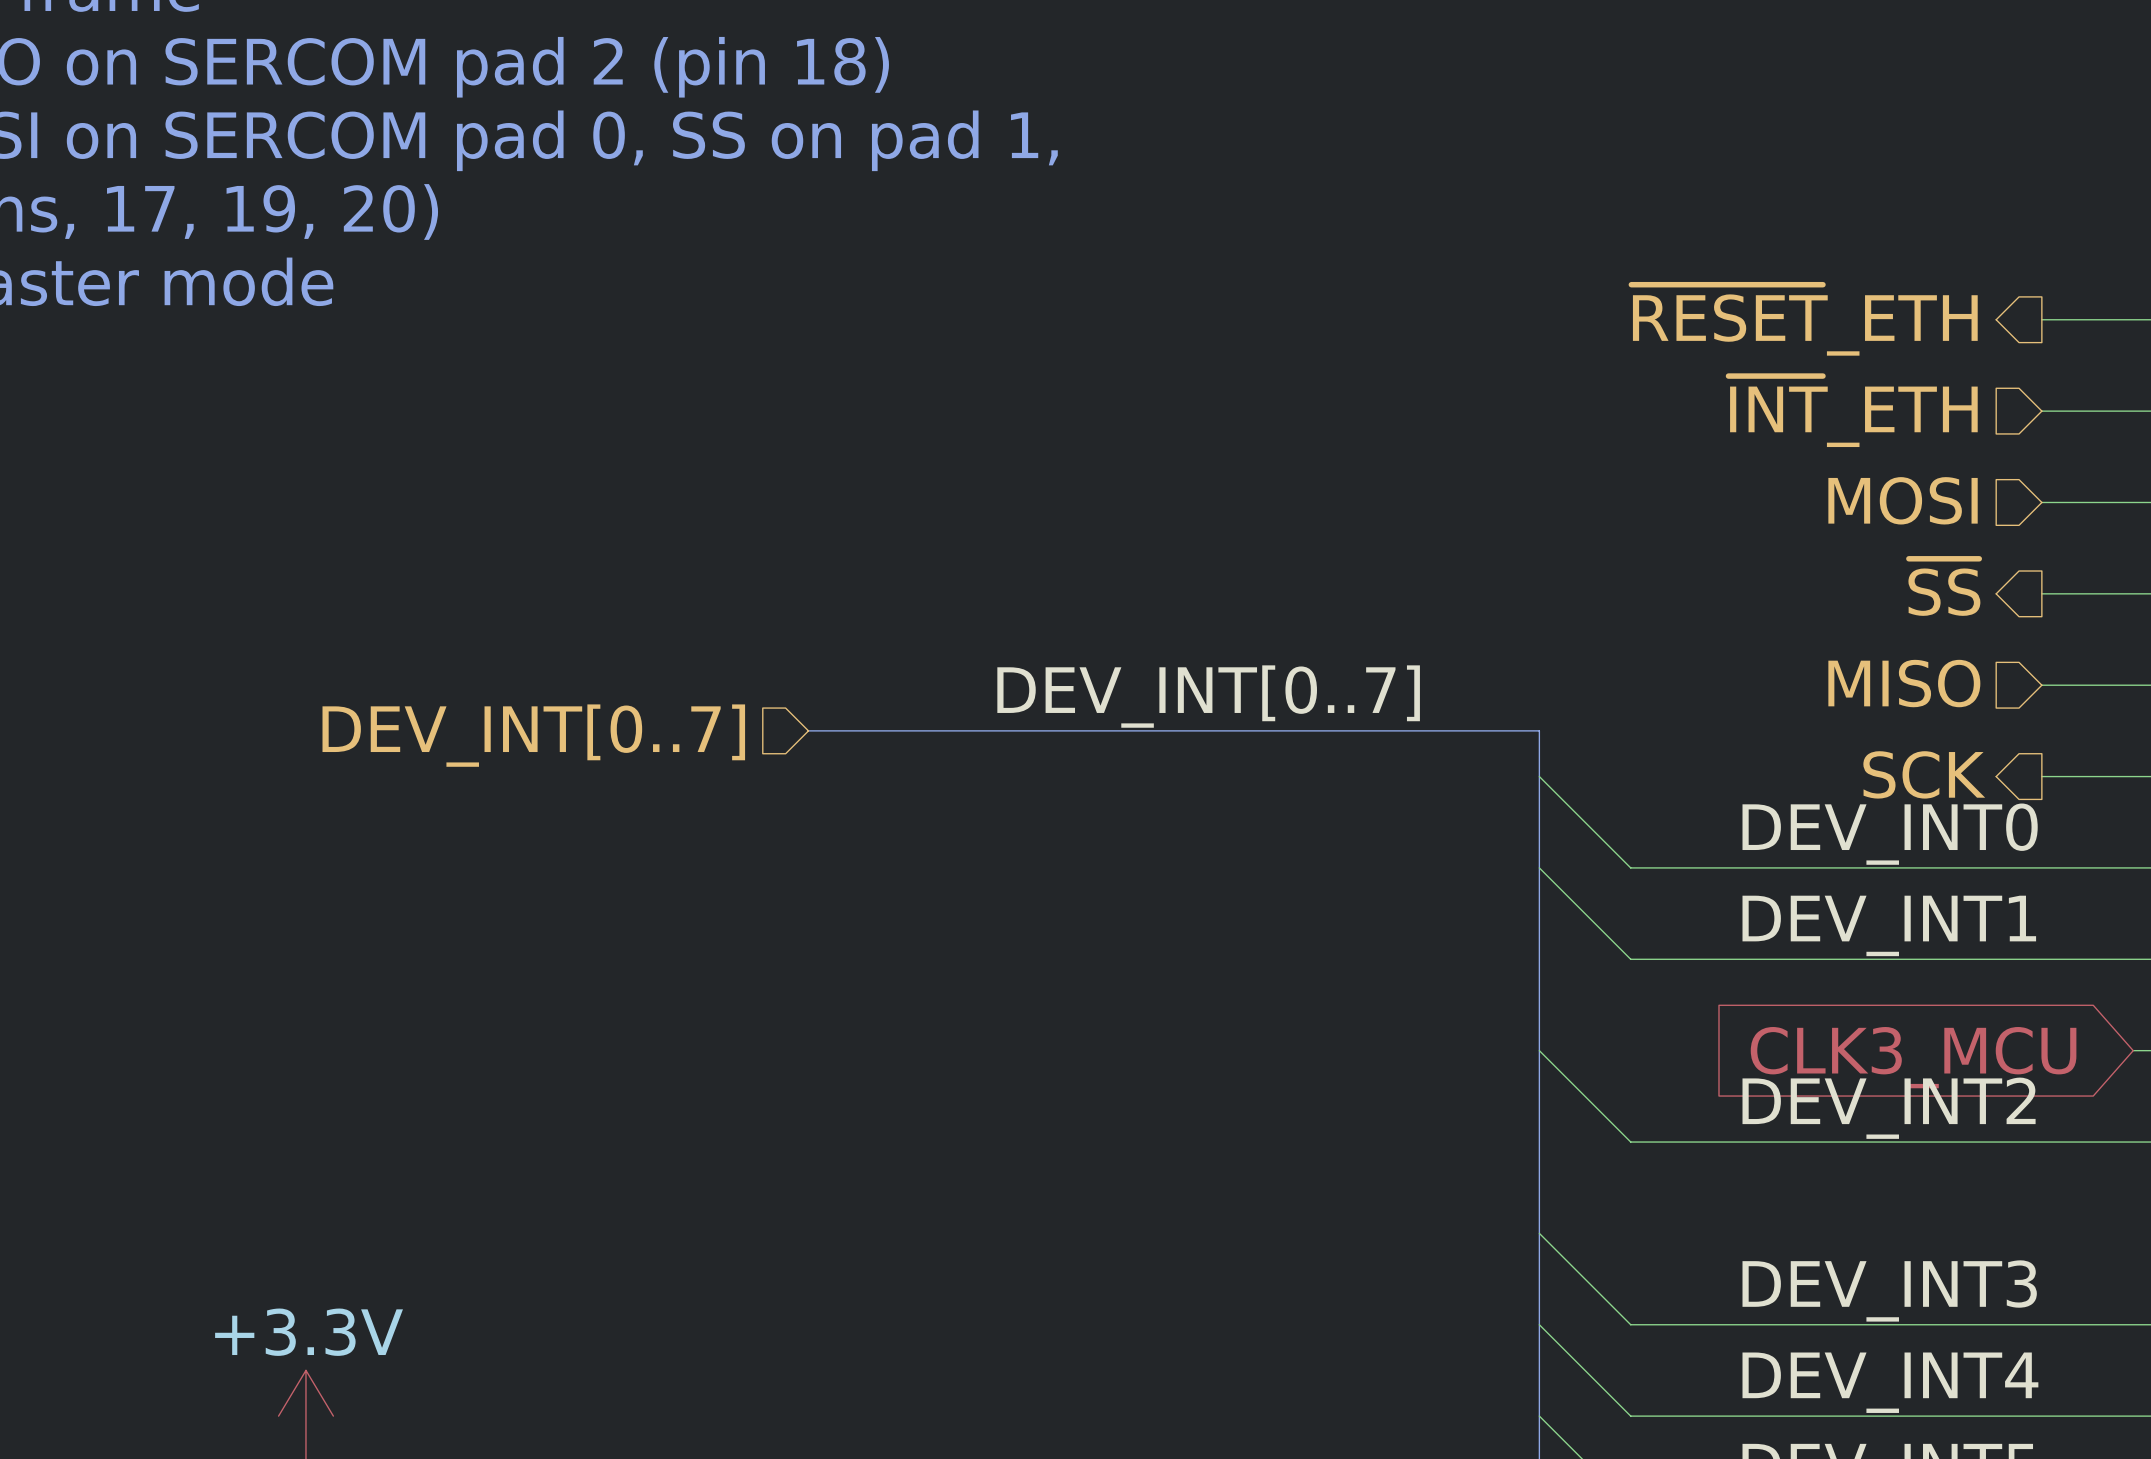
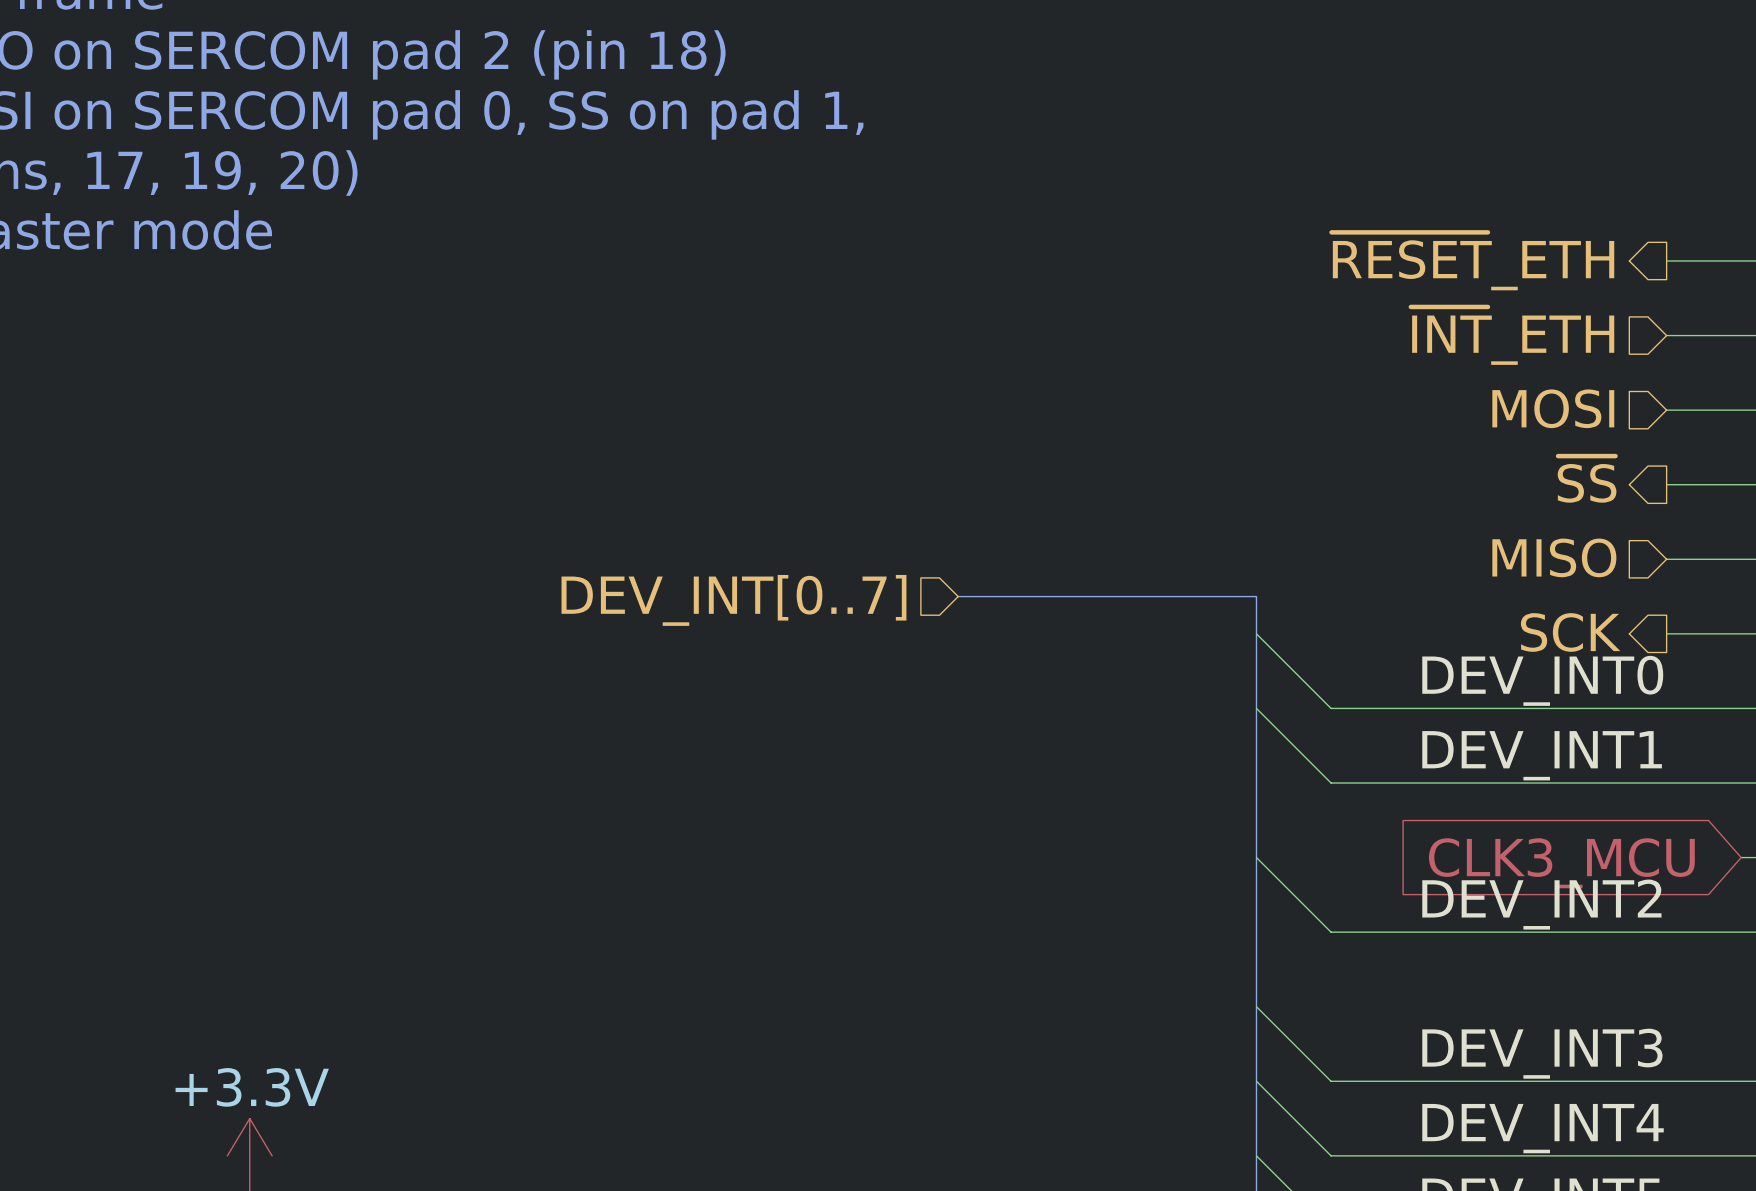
label: DEV_INT[0..7] (1208, 696) -> none
bus: (808, 730) (1173, 730) -> none
hierarchical label position: DEV_INT[0..7] (533, 735) -> DEV_INT[0..7] (733, 600)

